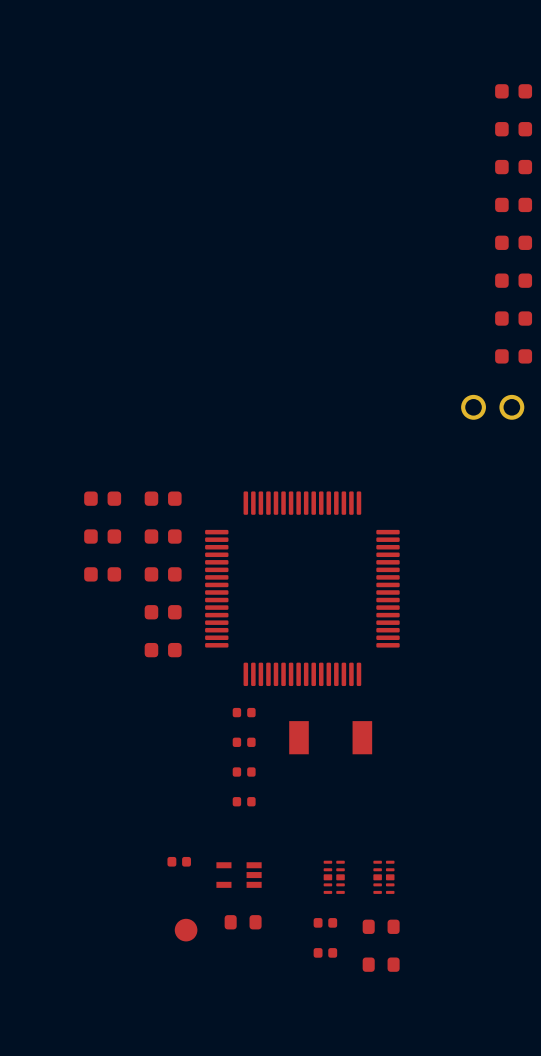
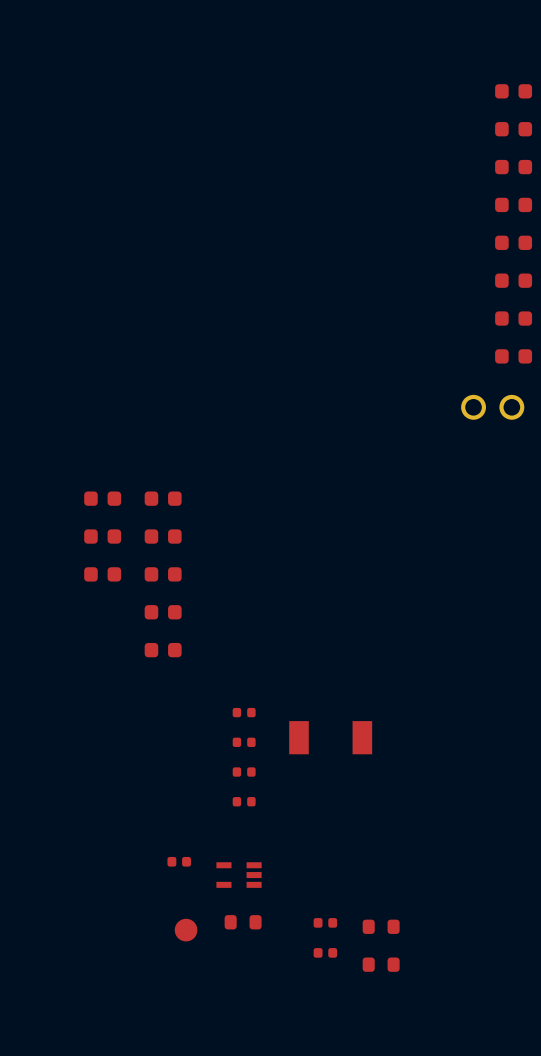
part: (302, 588) -> none
part: (334, 877) -> none
part: (383, 877) -> none

